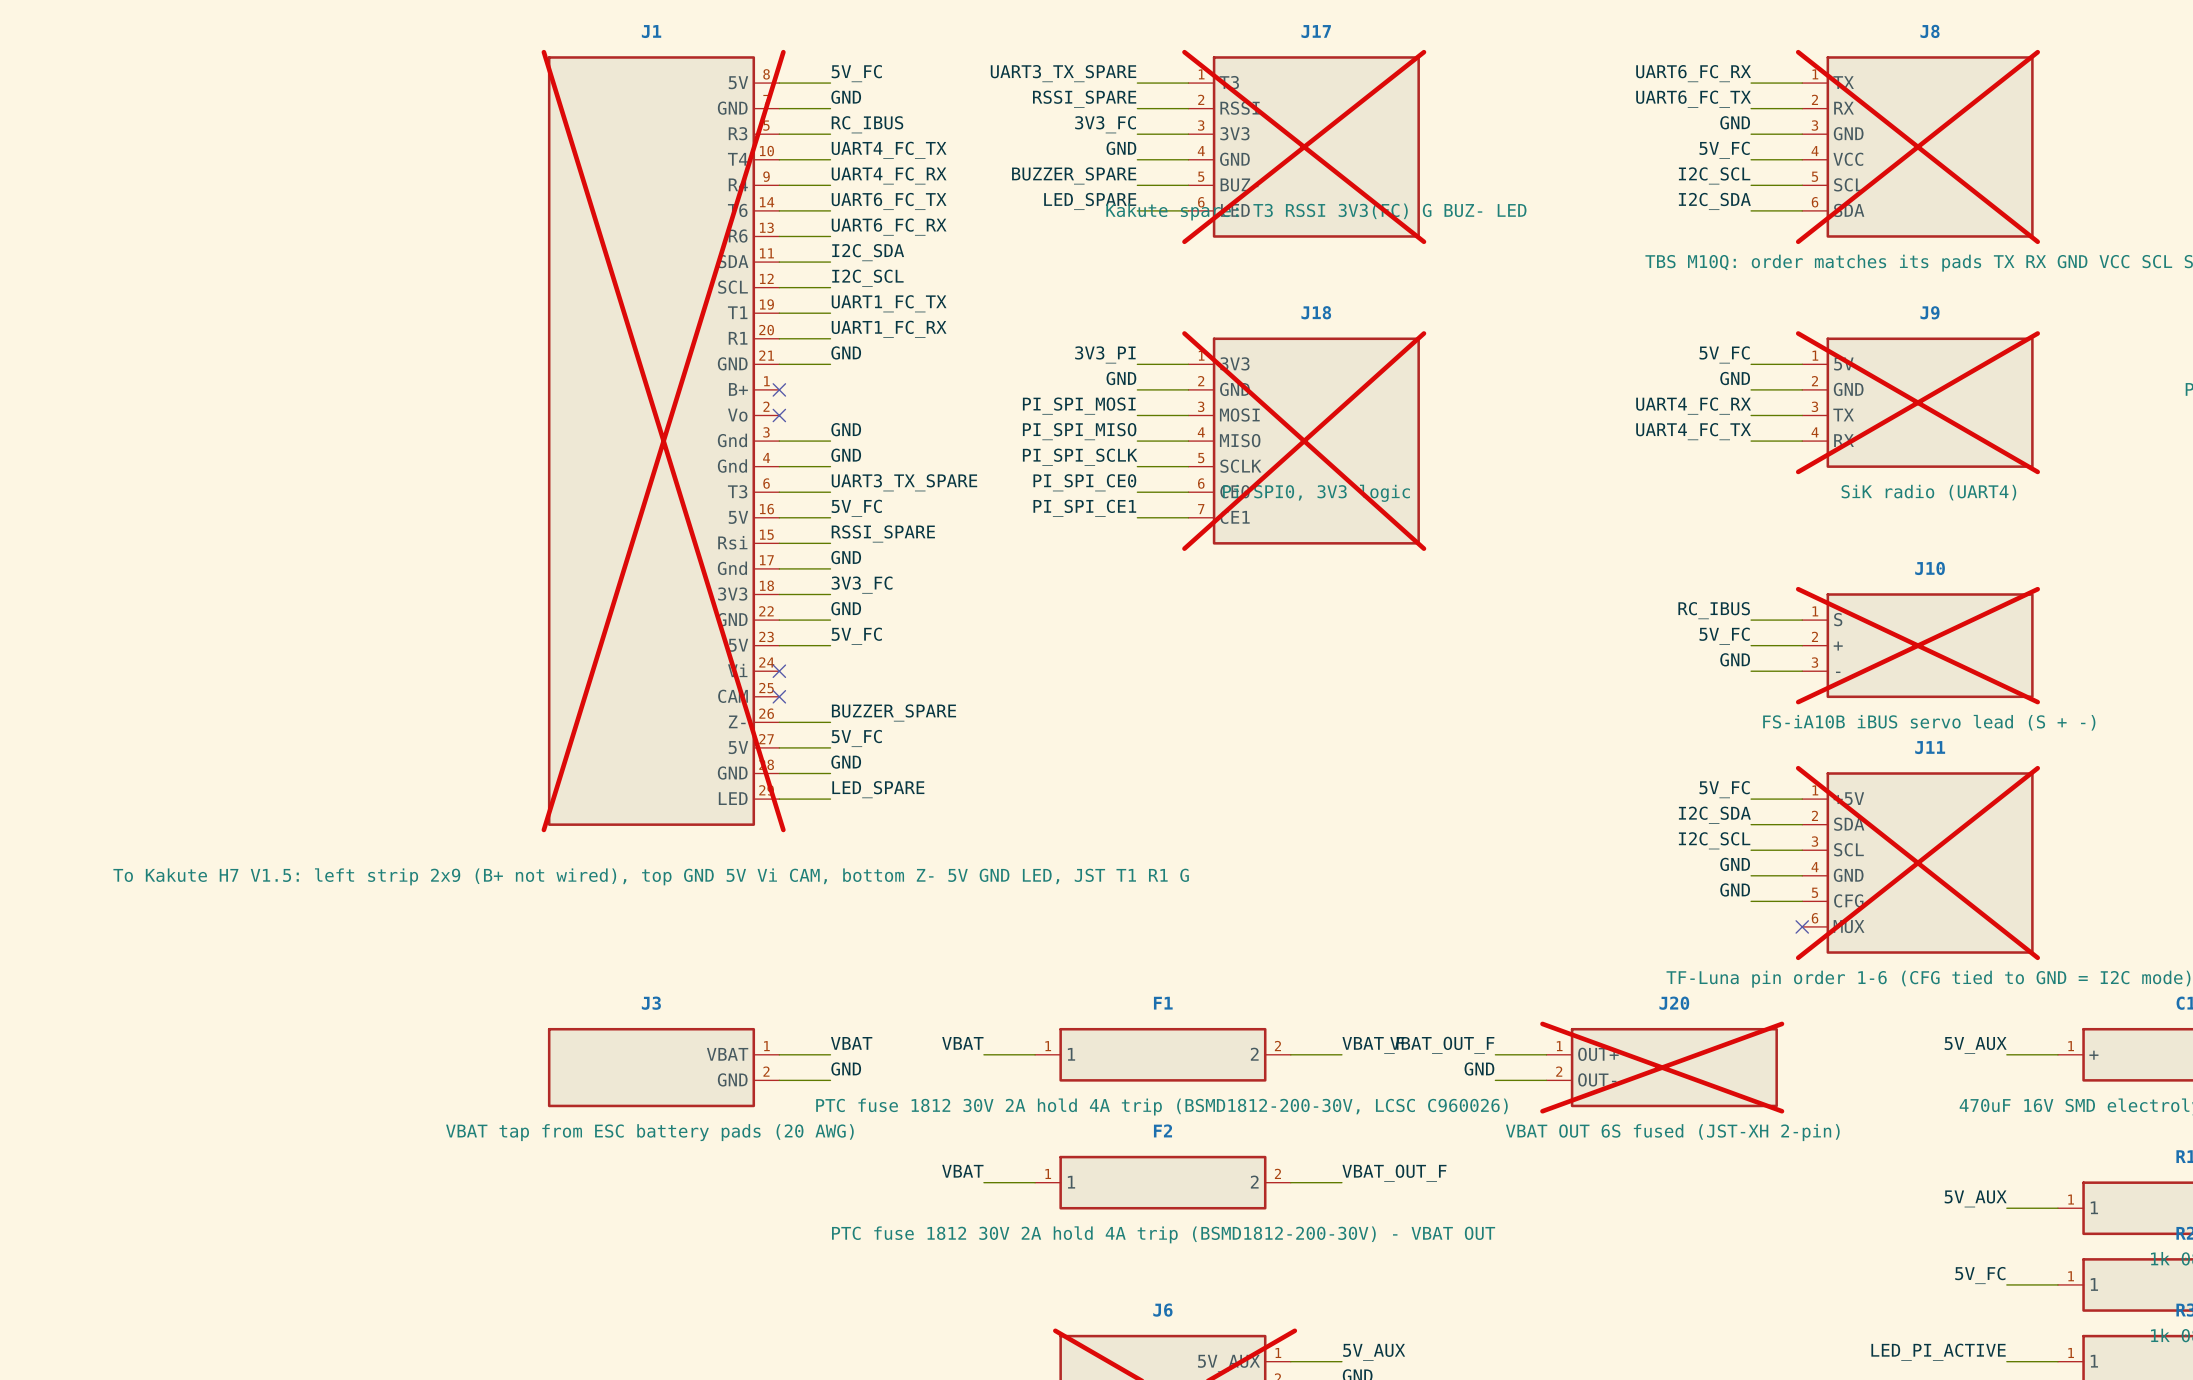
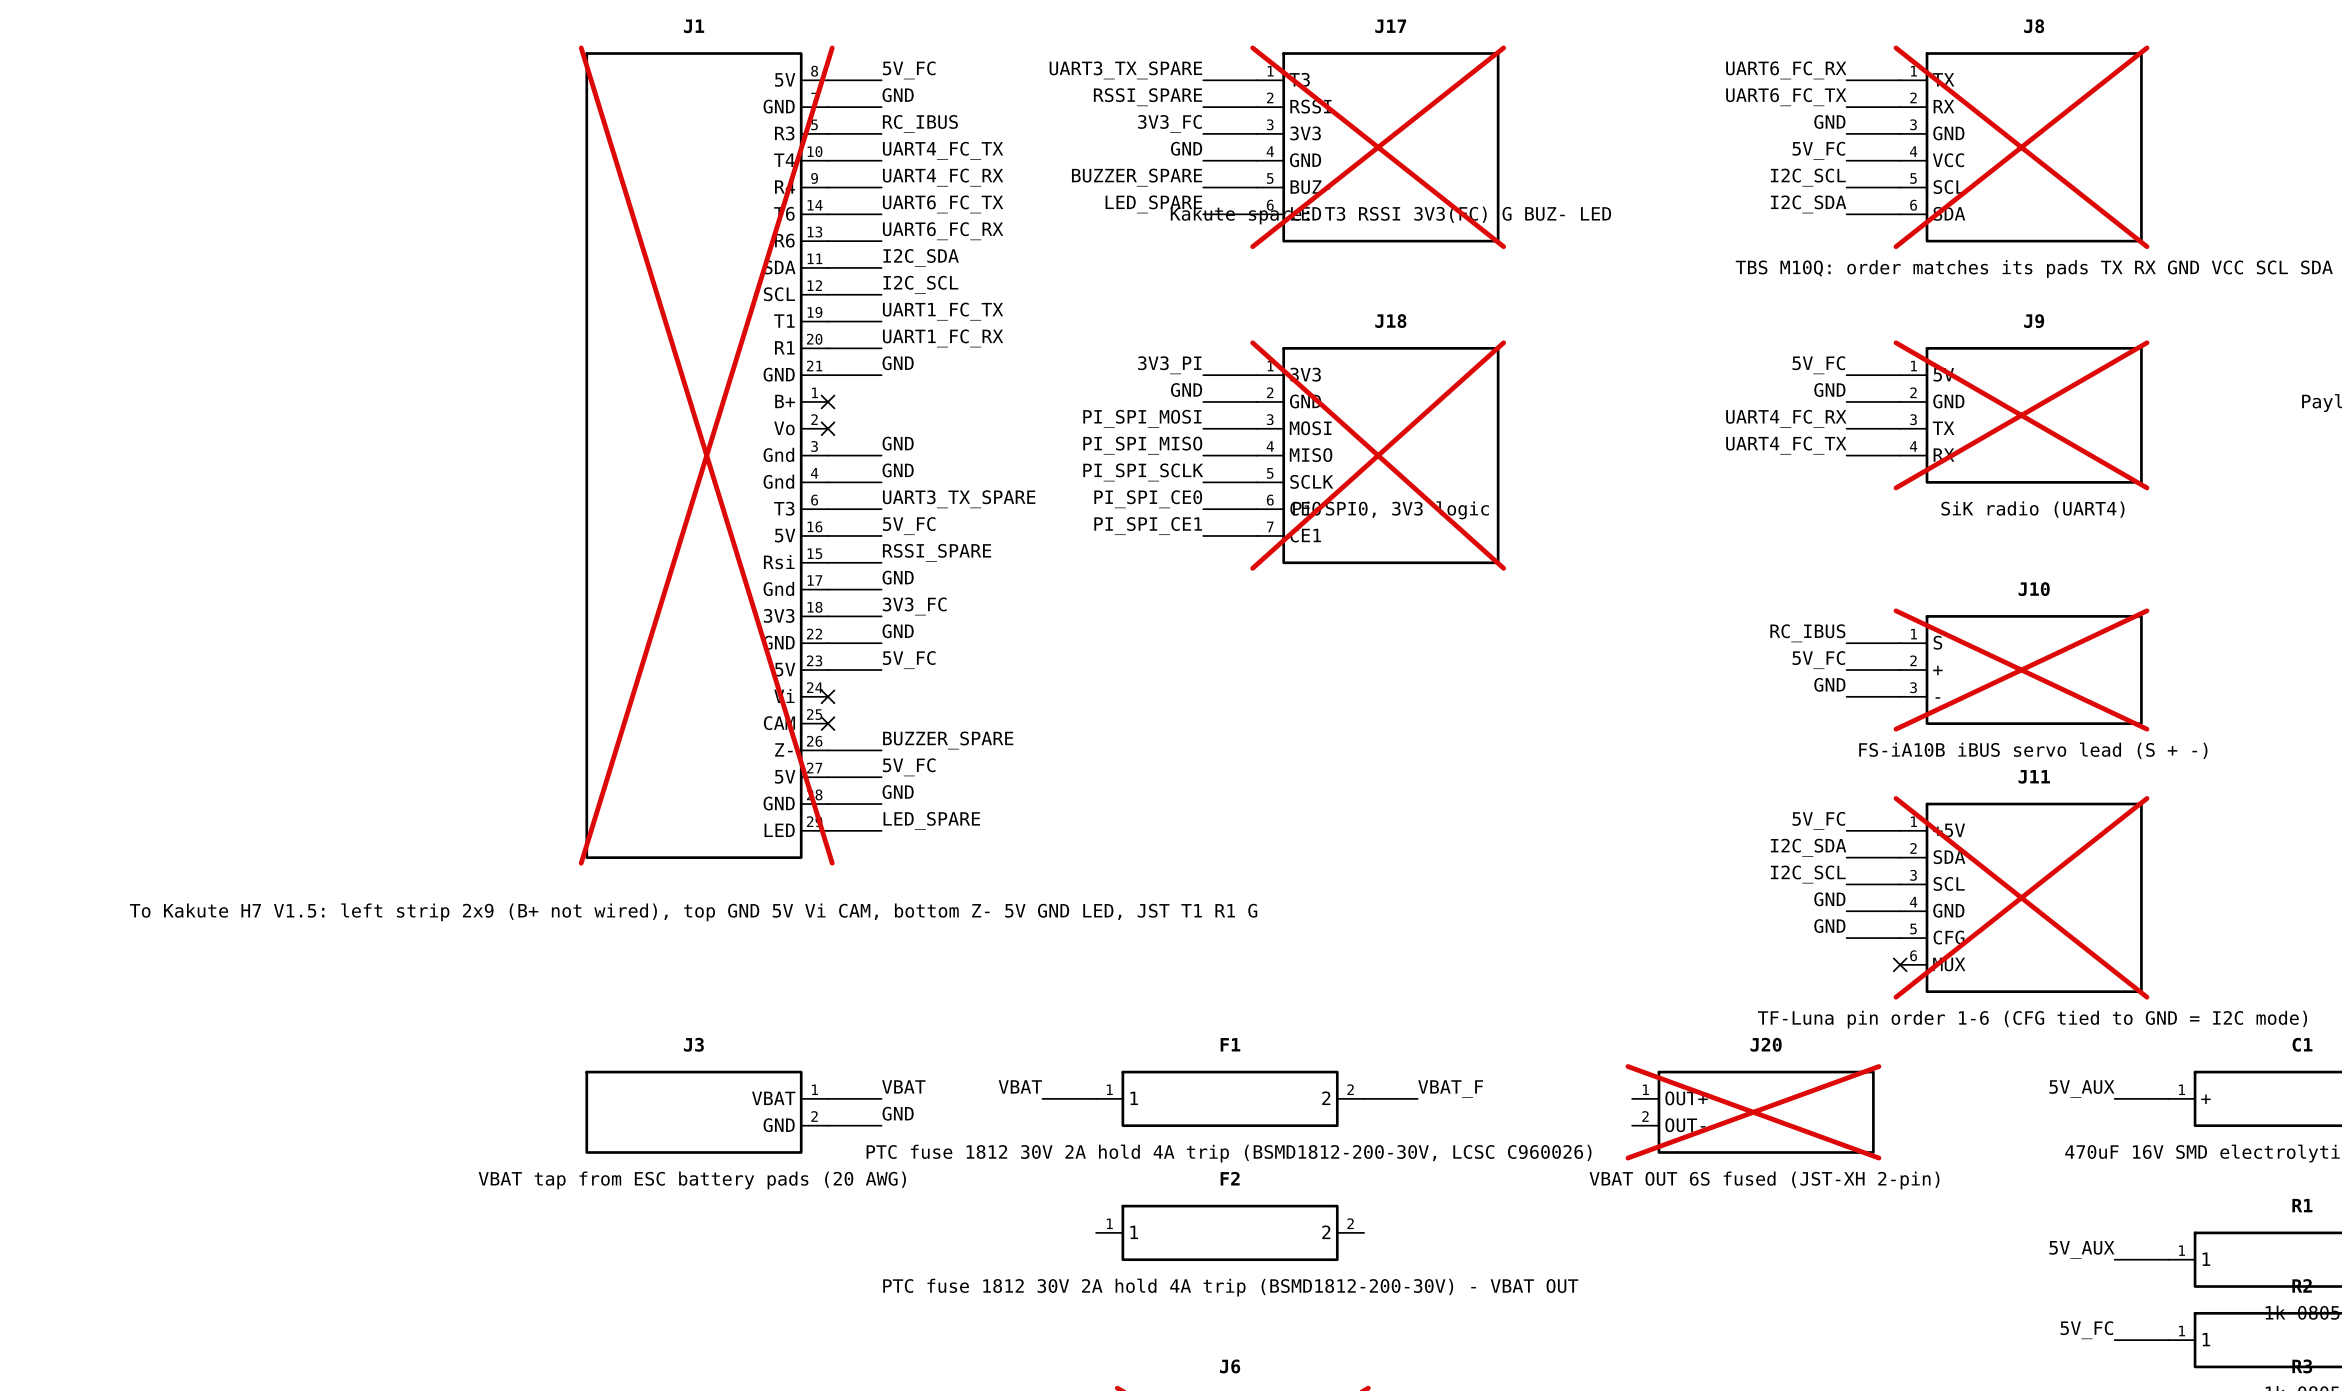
label: VBAT_OUT_F (1442, 1045) -> none
wire: (1495, 1054) (1546, 1054) -> none
label: GND (1479, 1068) -> none
wire: (1495, 1080) (1546, 1080) -> none
label: VBAT (962, 1171) -> none
label: VBAT_OUT_F (1394, 1173) -> none
wire: (983, 1182) (1035, 1182) -> none
wire: (1290, 1182) (1341, 1182) -> none

